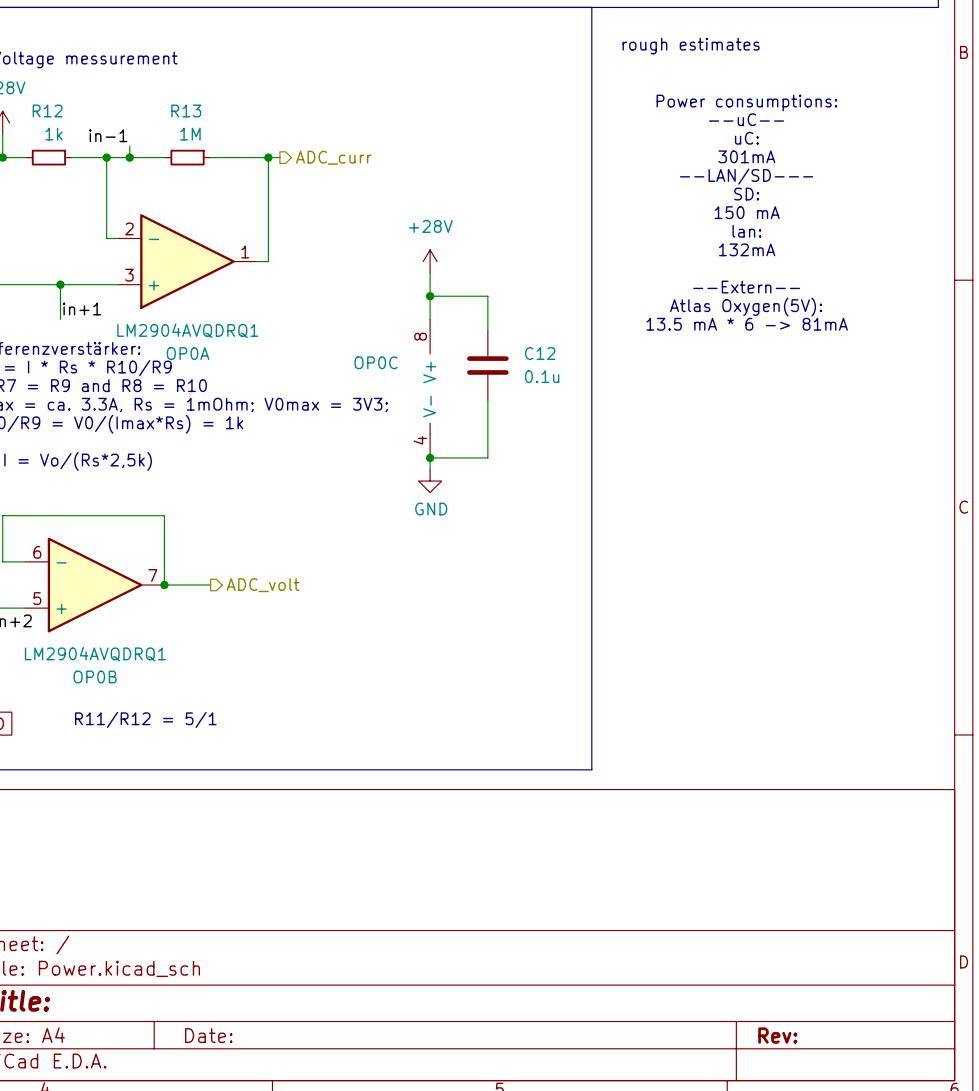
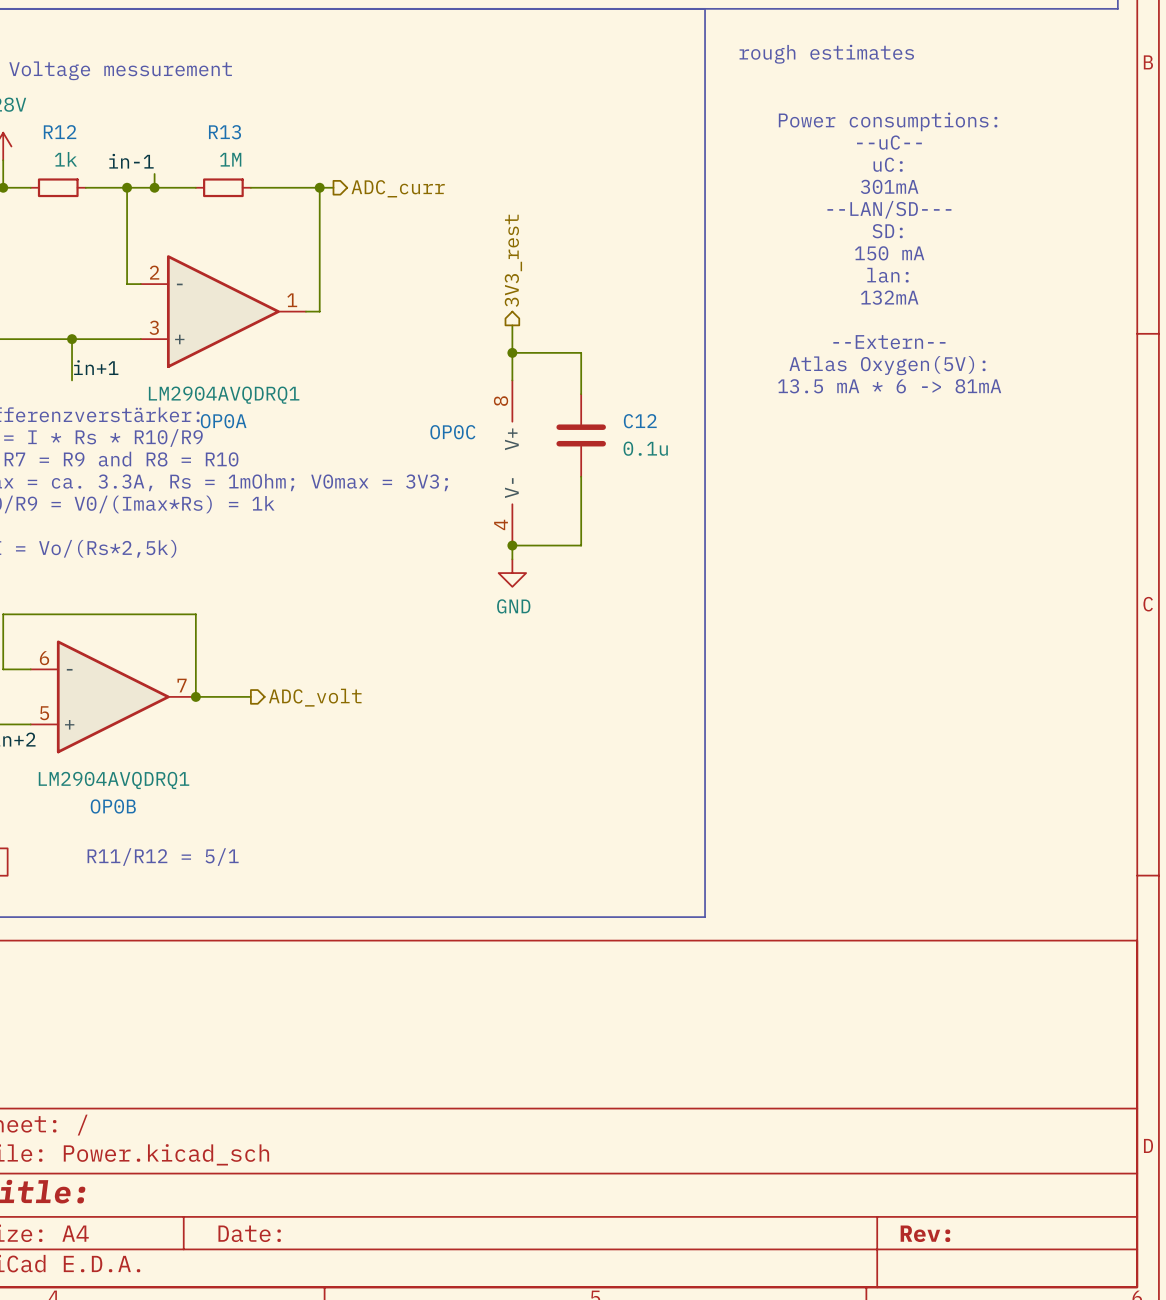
hierarchical label: none -> 3V3_rest (513, 260)
power symbol: +28V (430, 261) -> none

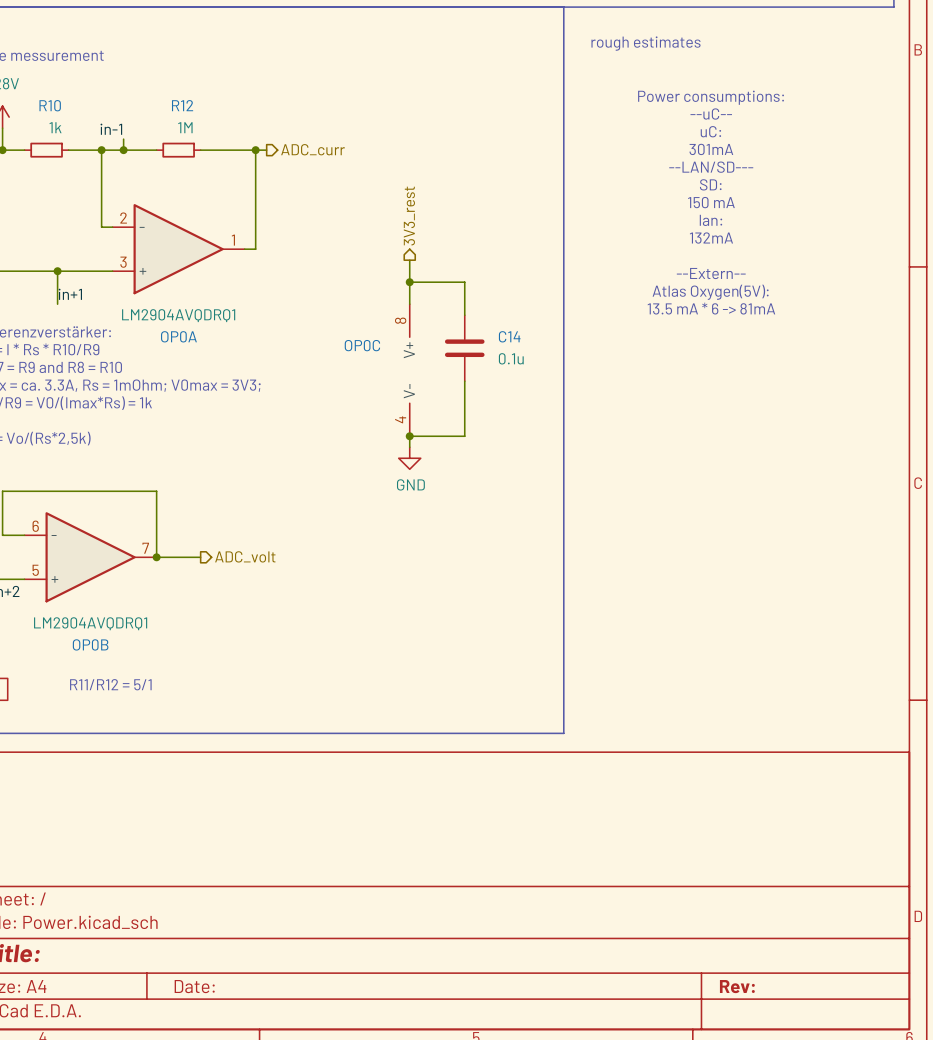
R12 name: R12 (60, 132) -> R10 (50, 105)
R13 name: R13 (224, 132) -> R12 (182, 105)
C12 name: C12 (640, 421) -> C14 (509, 336)

